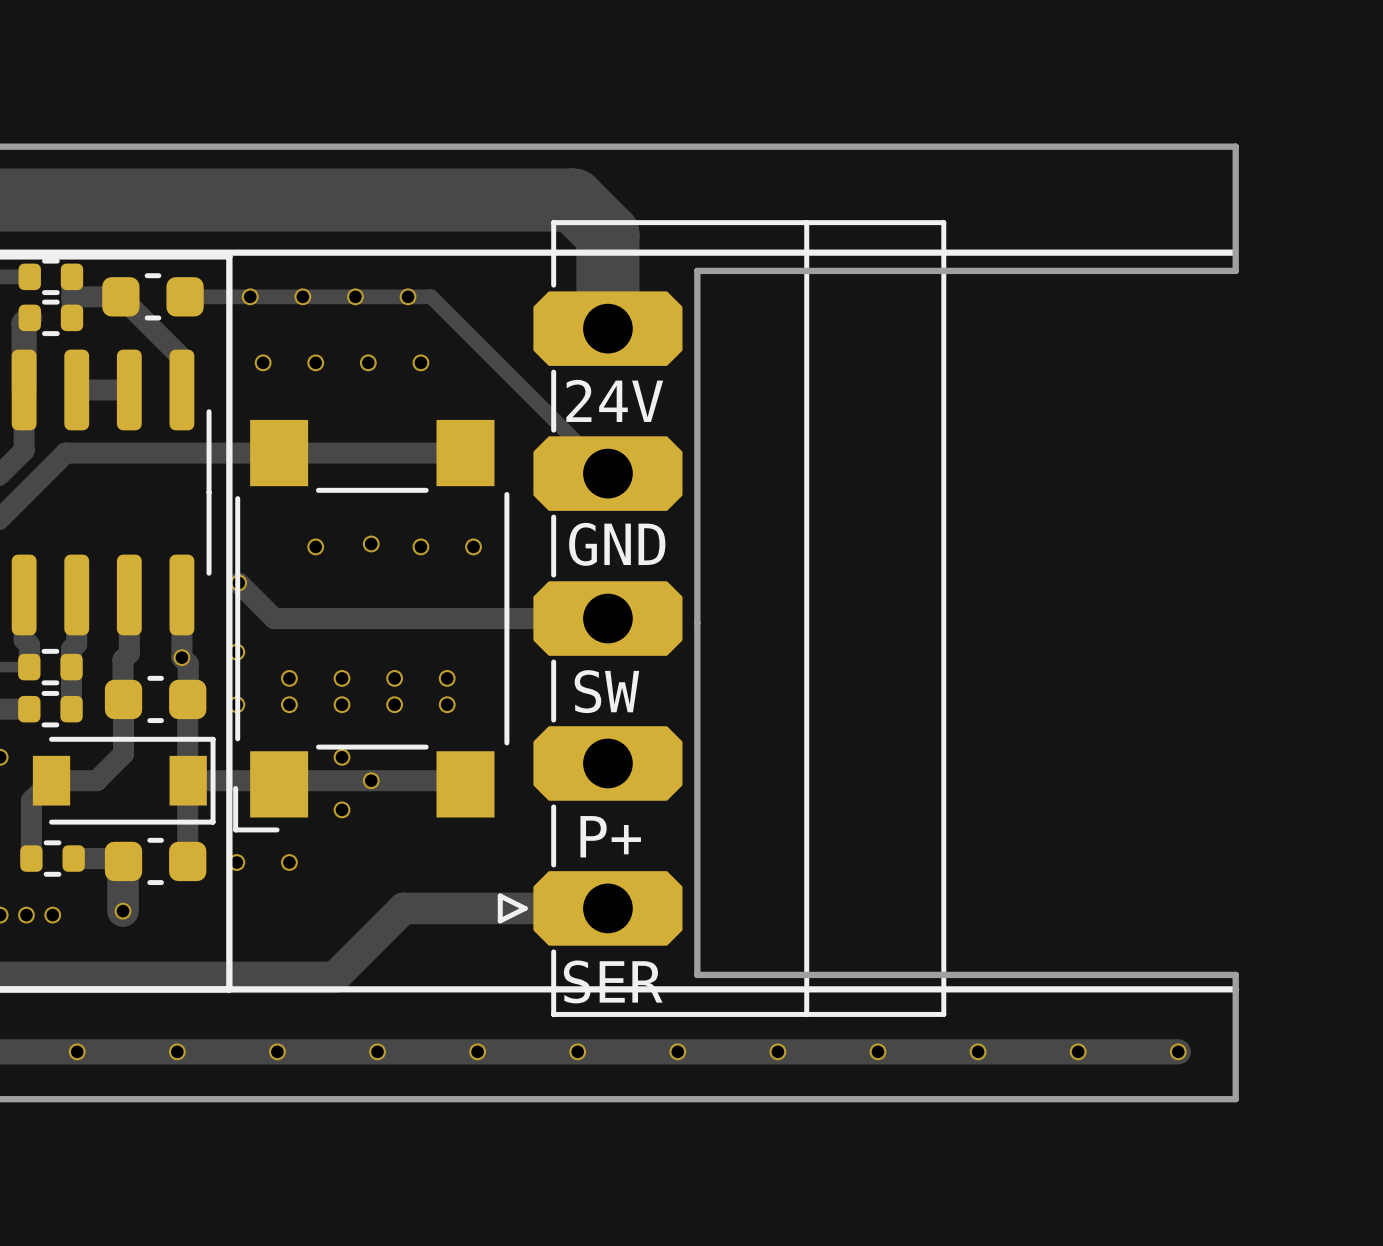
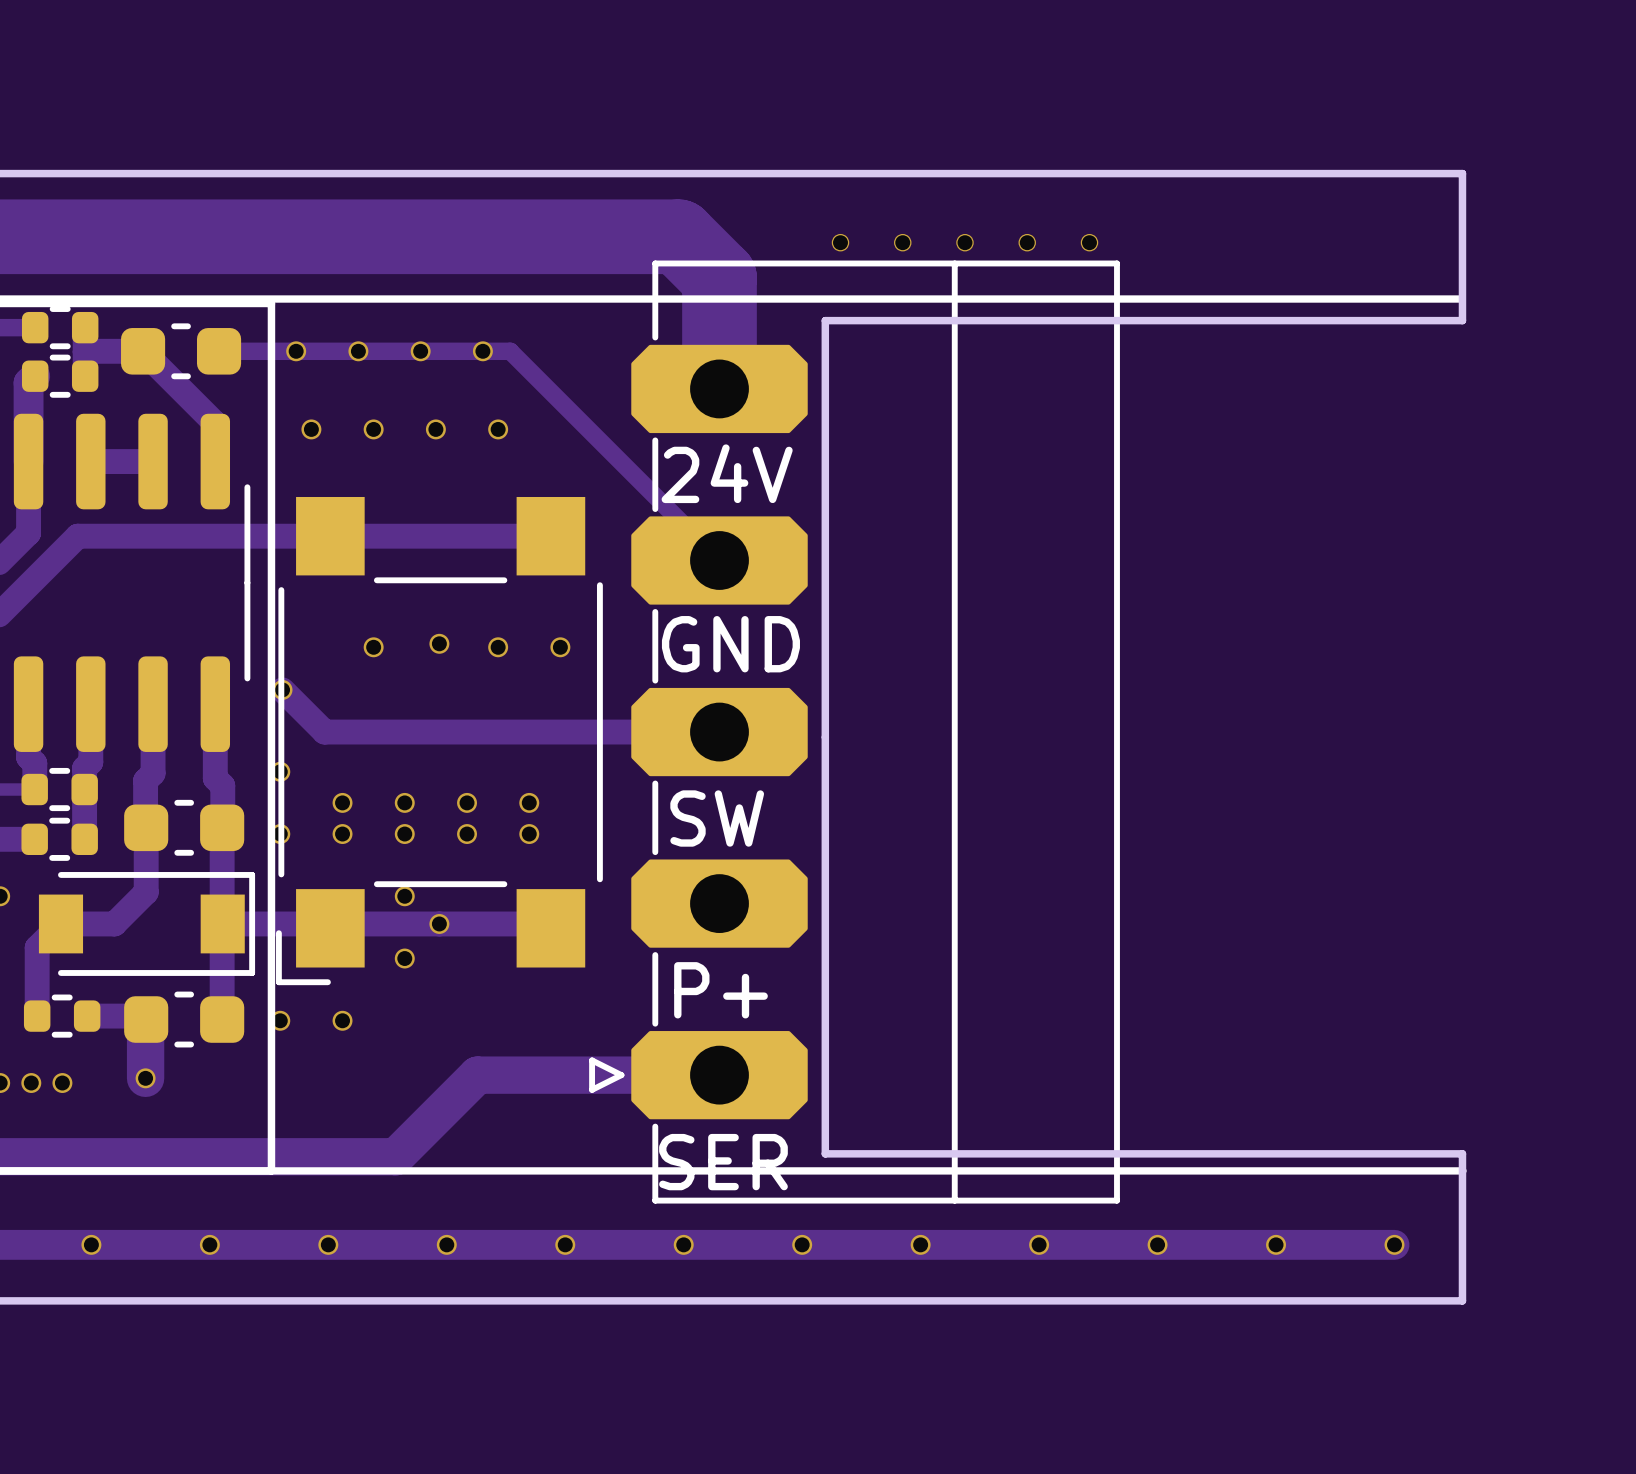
via: none -> (840, 242)
via: none -> (902, 242)
via: none -> (964, 242)
via: none -> (1027, 242)
via: none -> (1089, 242)
via: (181, 657) -> none

